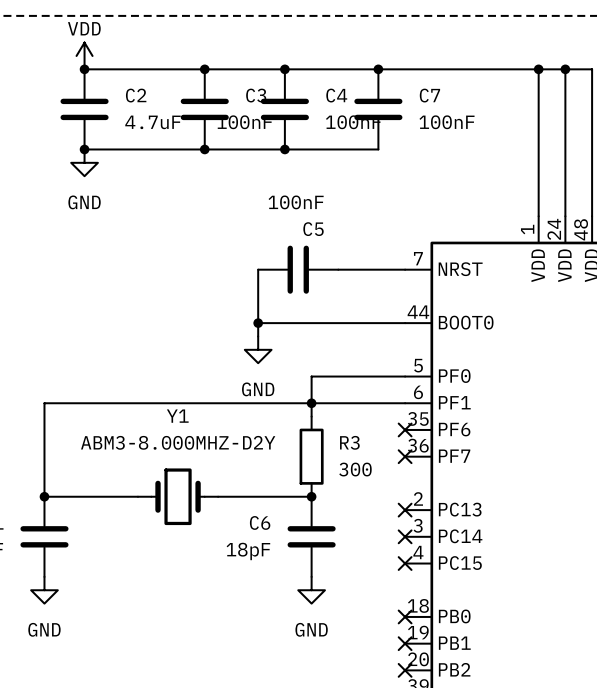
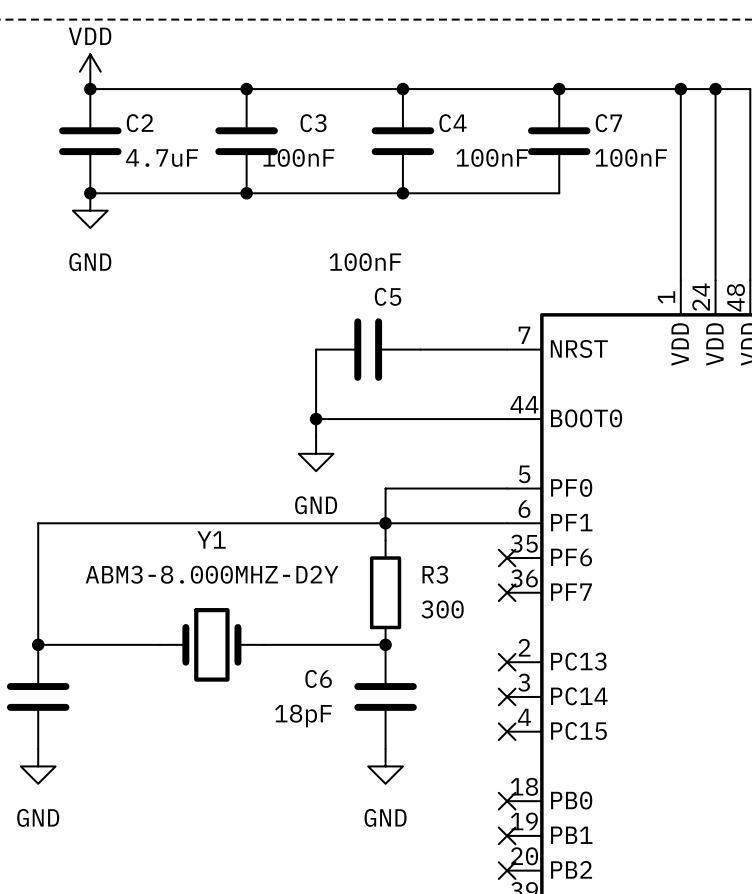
junction: (284, 69) -> none
junction: none -> (402, 89)
junction: (378, 69) -> none
junction: none -> (559, 89)
C2 name position: C2 (136, 95) -> C2 (140, 123)
C4 name position: C4 (336, 95) -> C4 (453, 123)
C7 name position: C7 (429, 95) -> C7 (608, 123)
C4 position: (284, 109) -> (402, 141)
C7 position: (378, 109) -> (559, 141)
C2 value position: 4.7uF (152, 122) -> 4.7uF (161, 158)
C7 value position: 100nF (447, 122) -> 100nF (631, 157)
junction position: (284, 149) -> (402, 193)
wire: none -> (472, 193) (559, 193)

